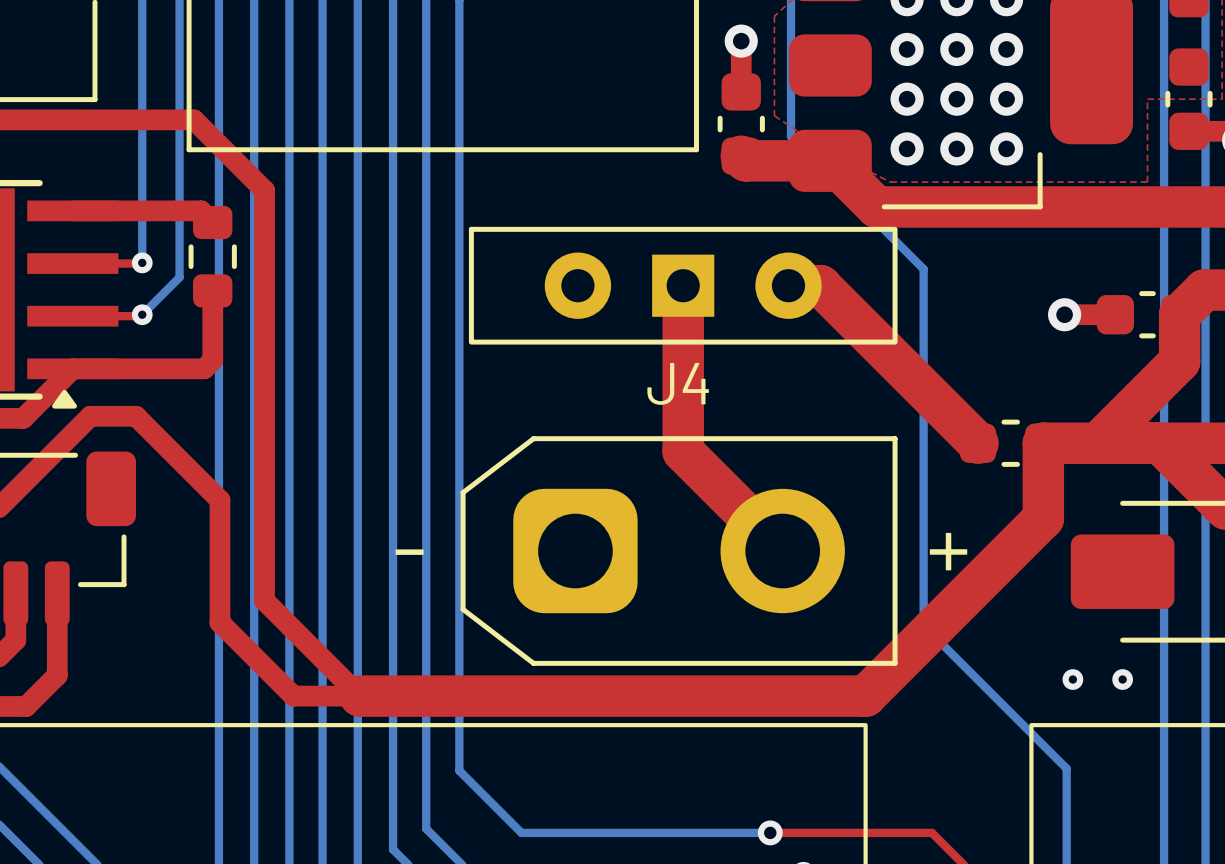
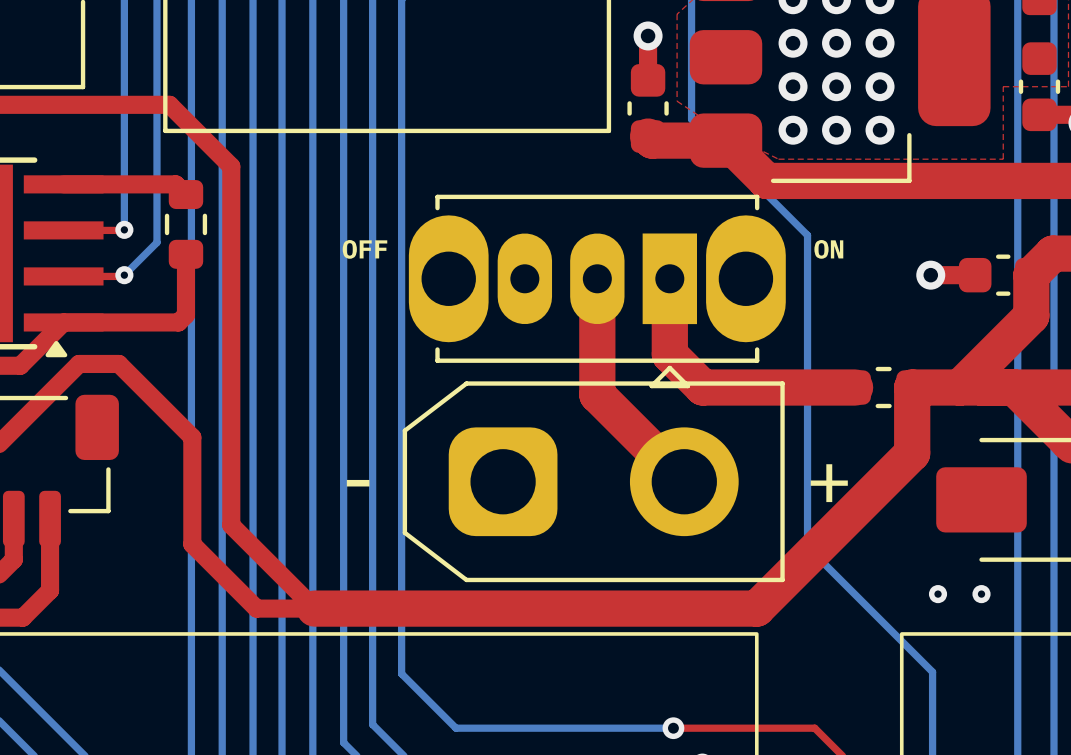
text: none -> OFF (364, 249)
part: (683, 285) -> none
top track: (788, 285) (820, 285) (978, 443) -> (669, 278) (669, 354) (702, 387) (855, 387)
text: none -> ON (828, 249)
part: none -> (597, 291)
J4 name: J4 (678, 383) -> none

